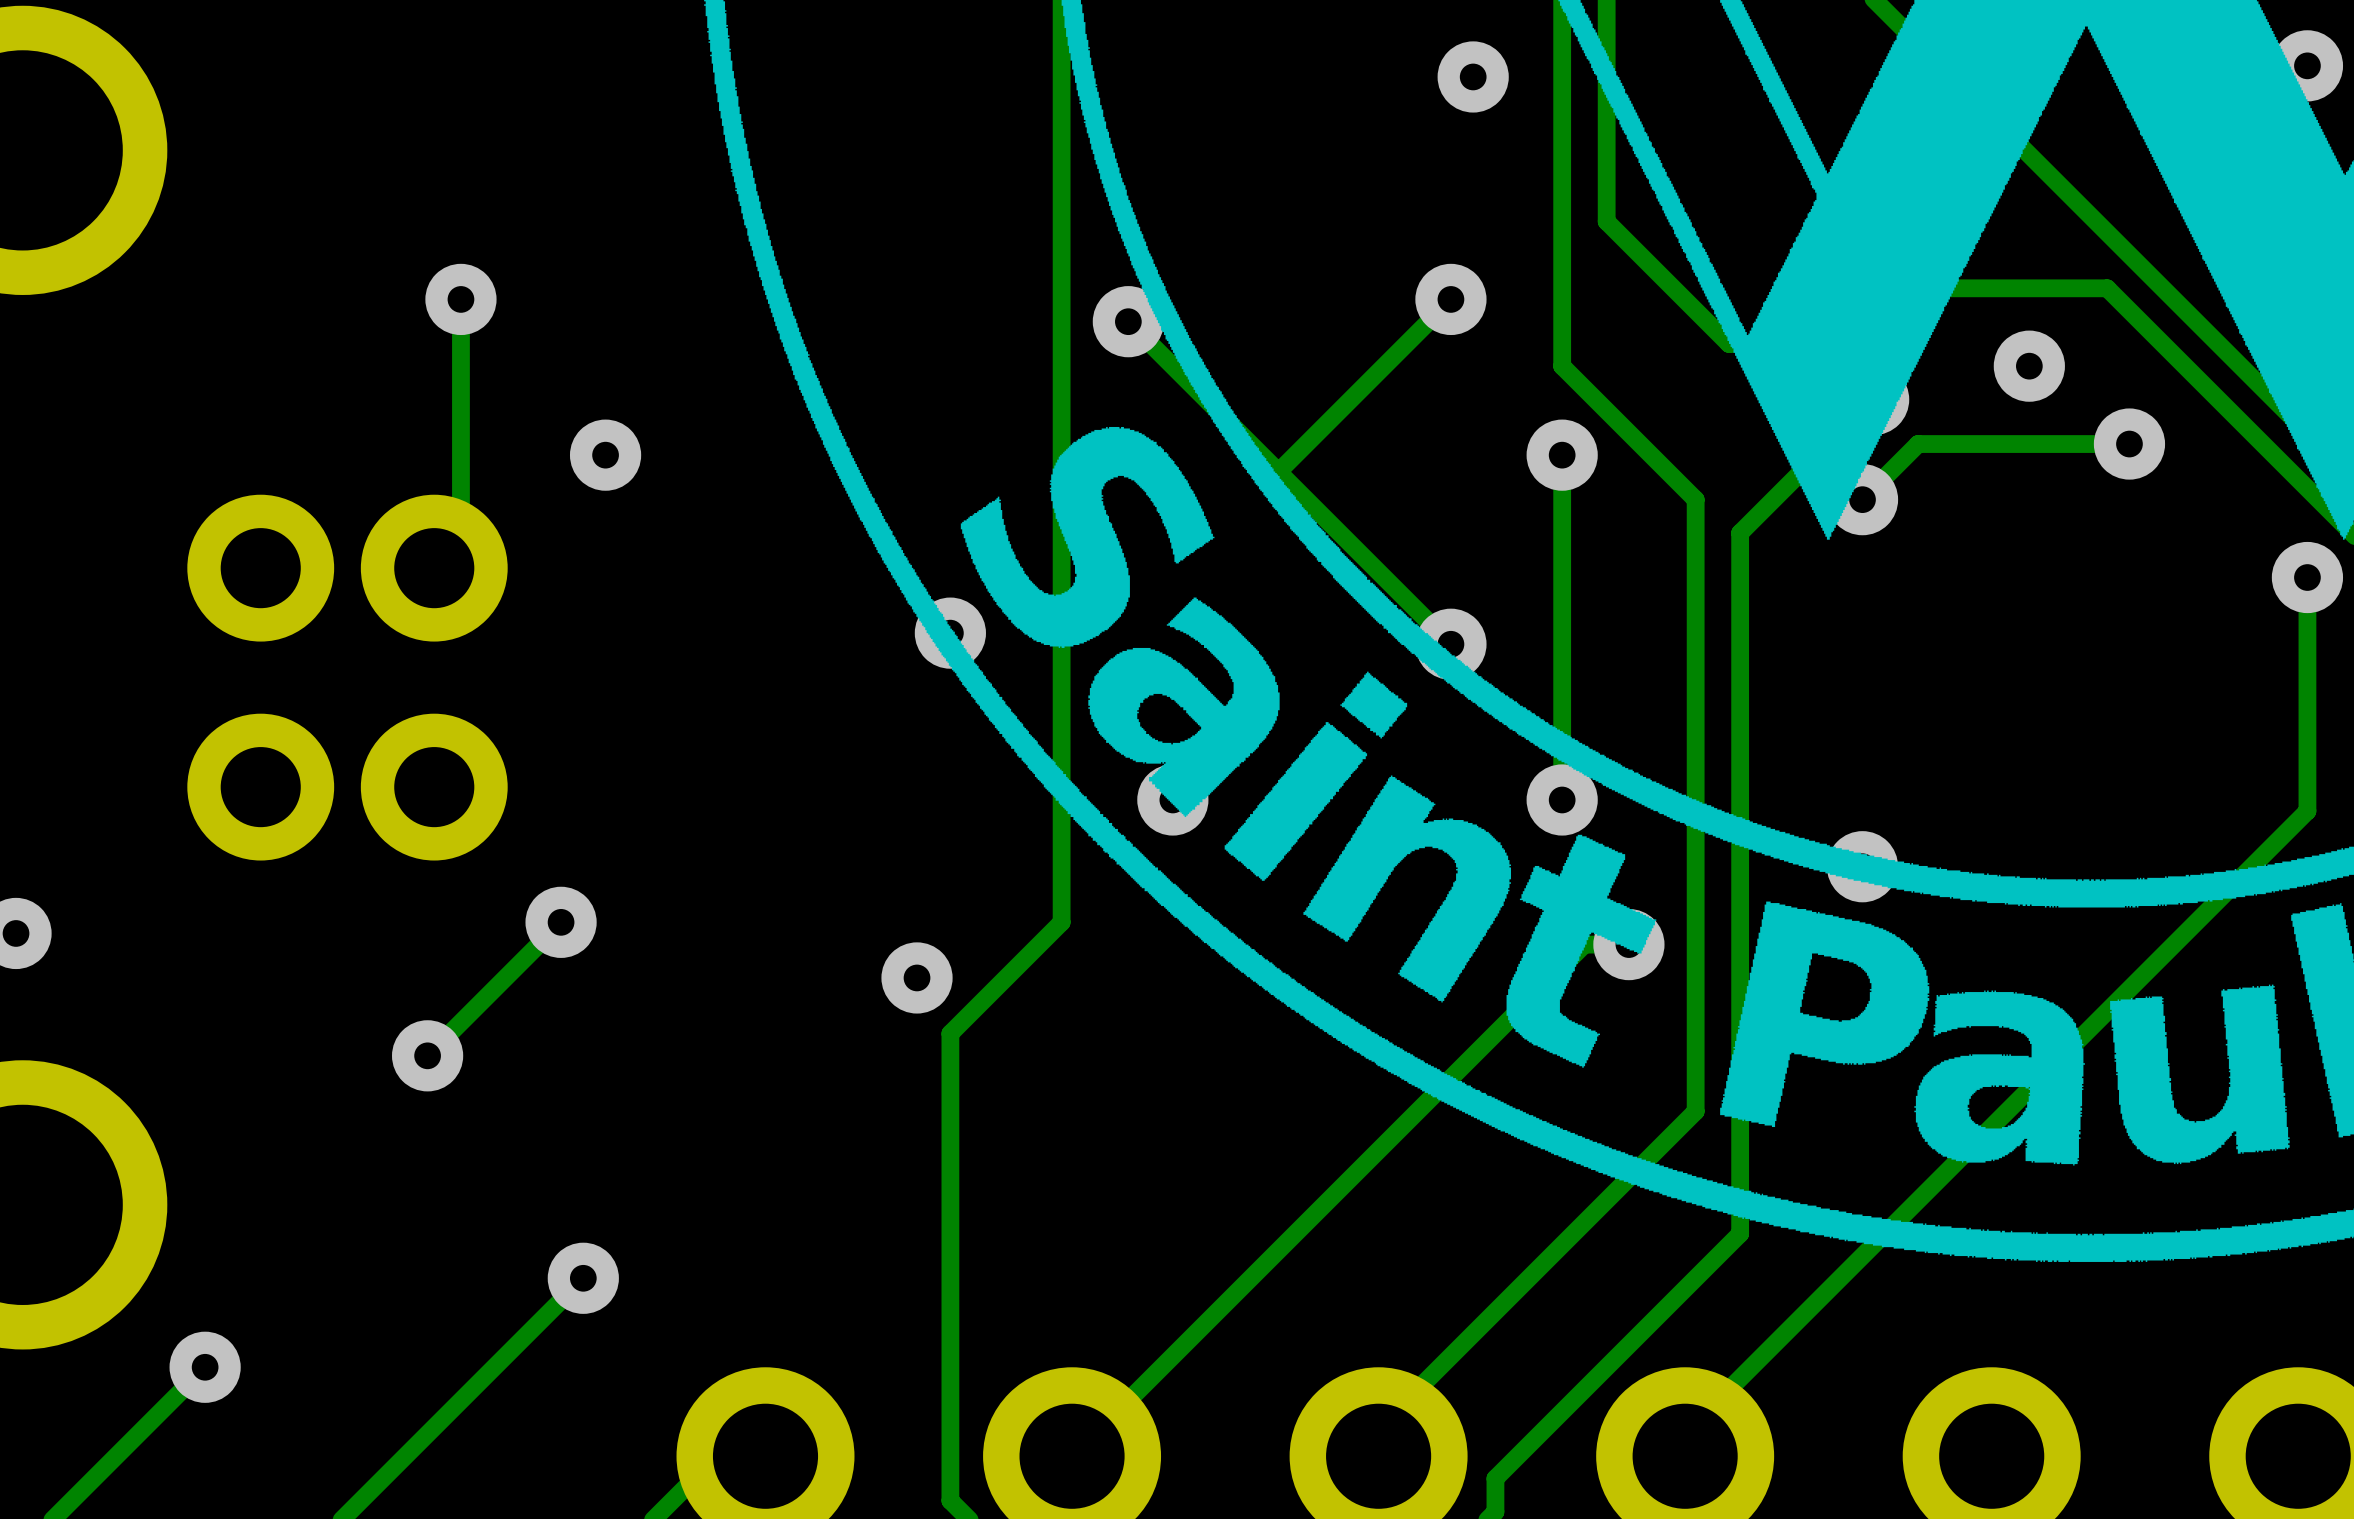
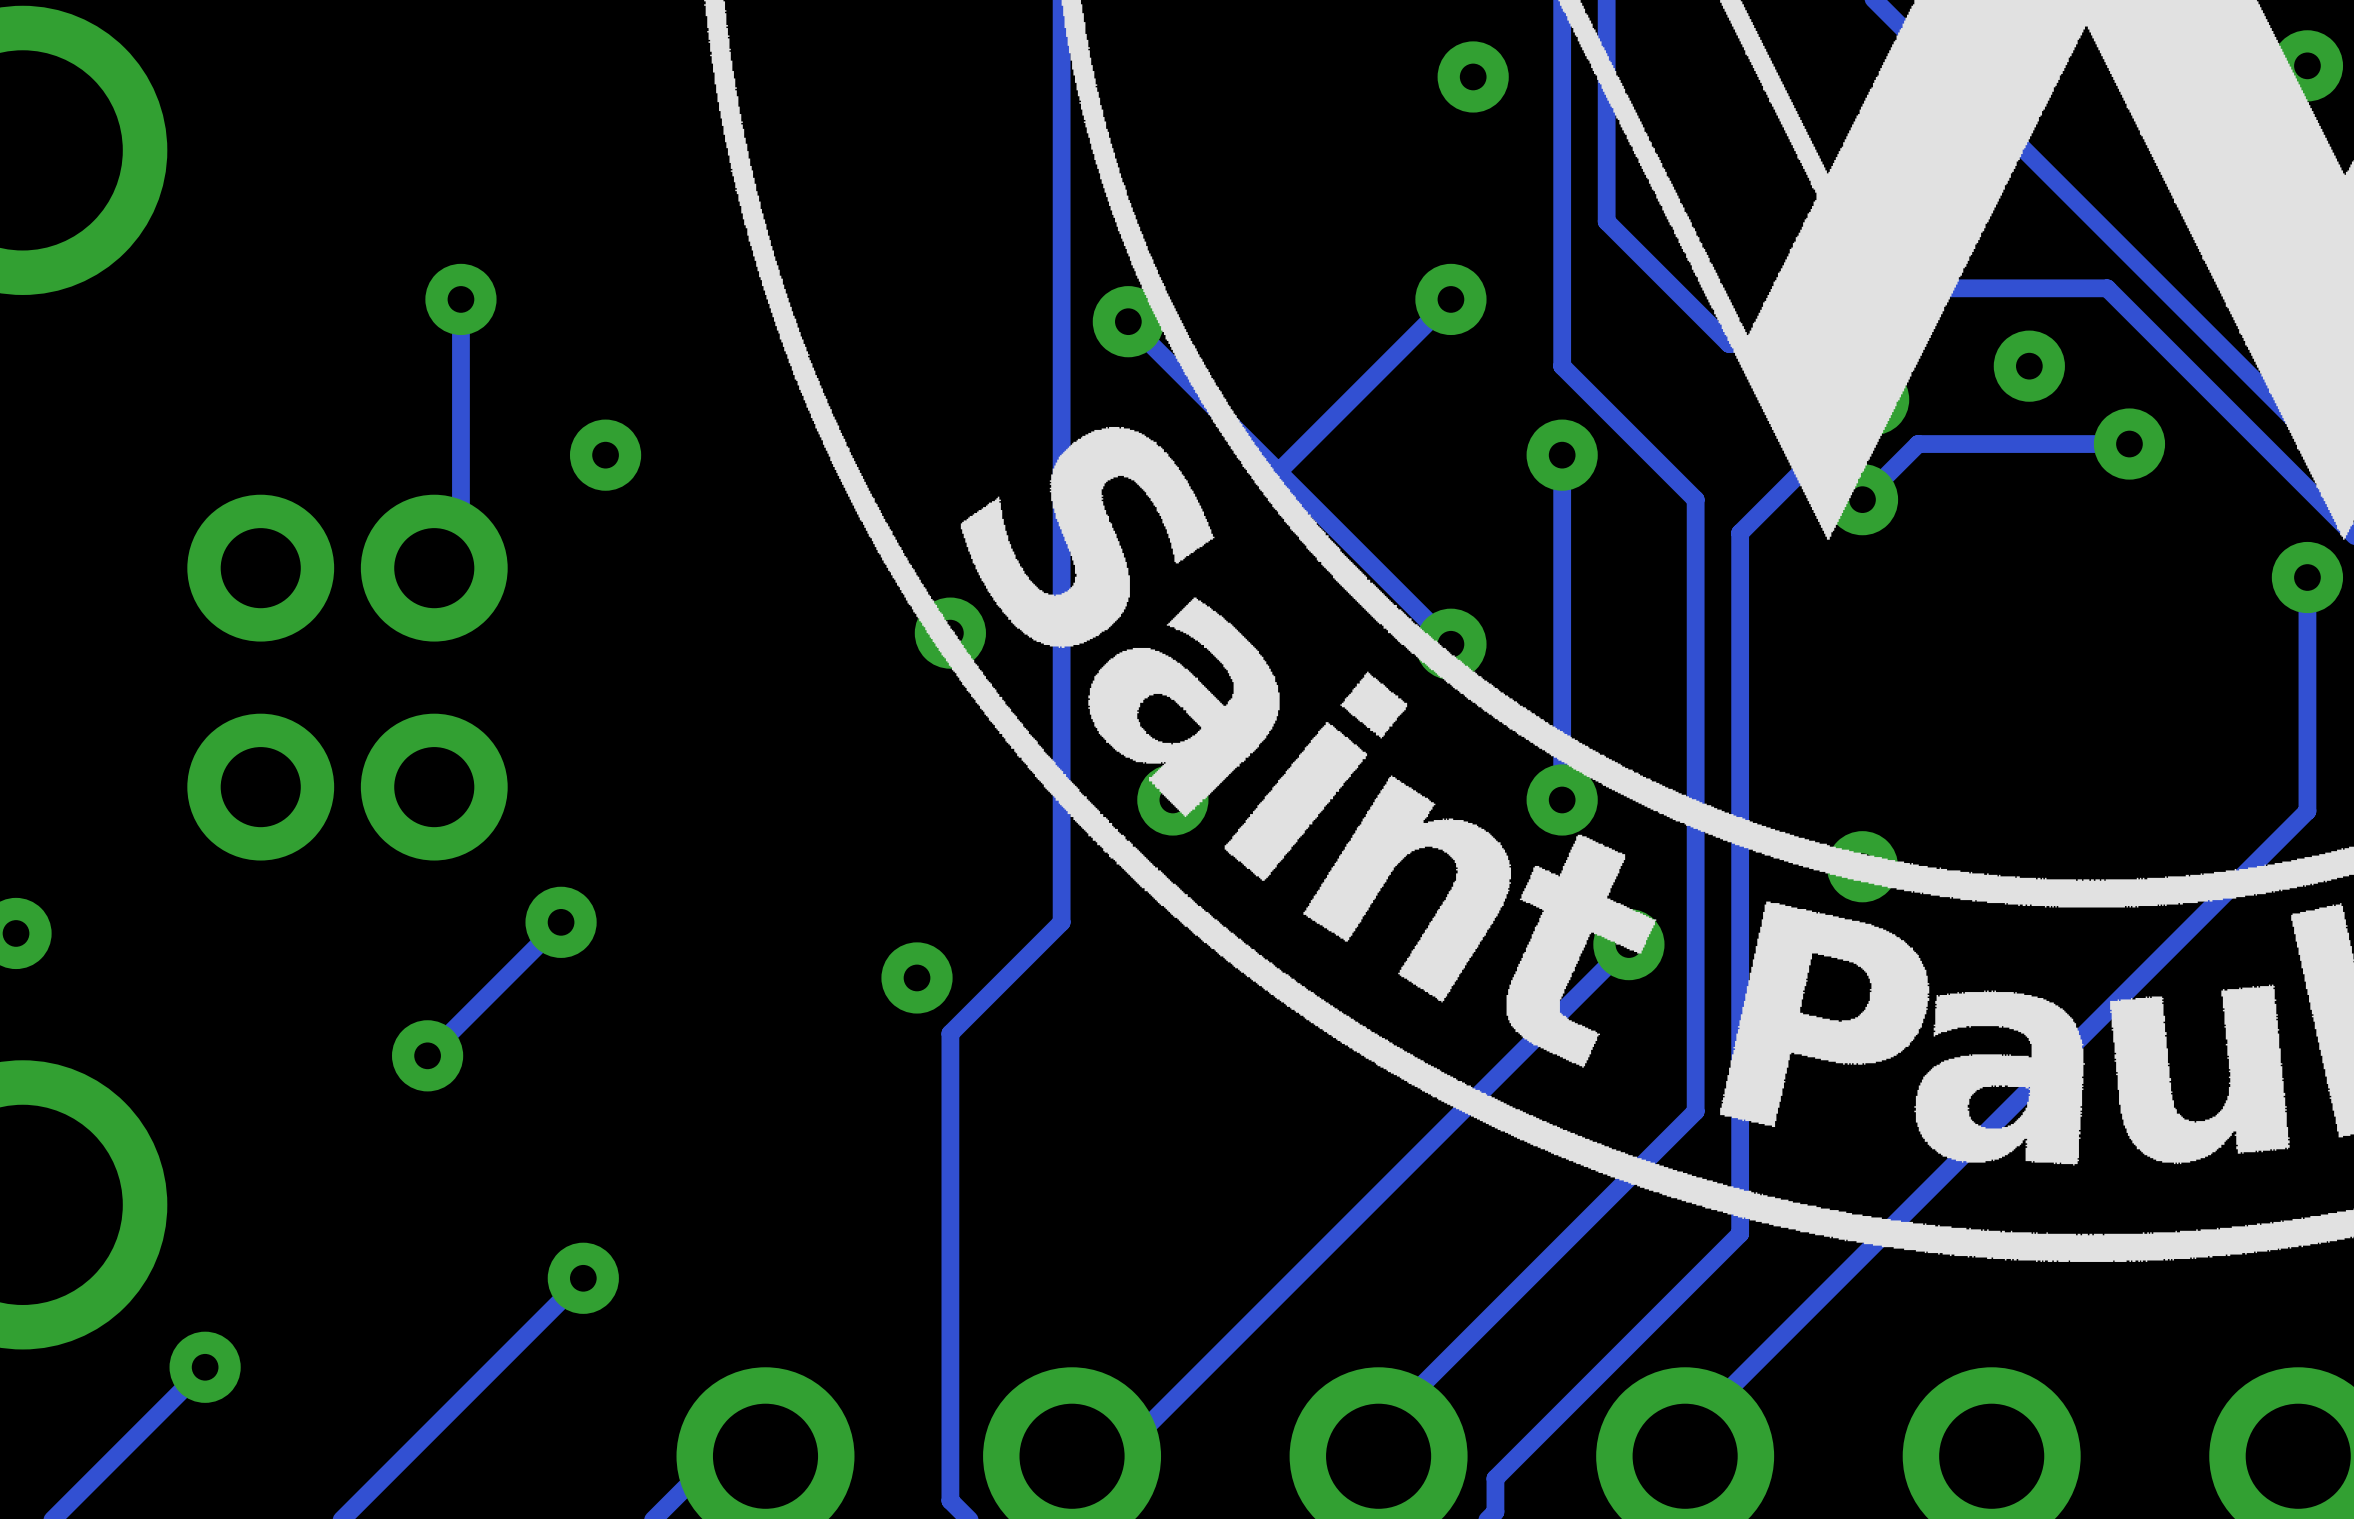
track: (1628, 944) (1584, 944) (1072, 1456) -> (1628, 944) (1117, 1456) (1072, 1456)

